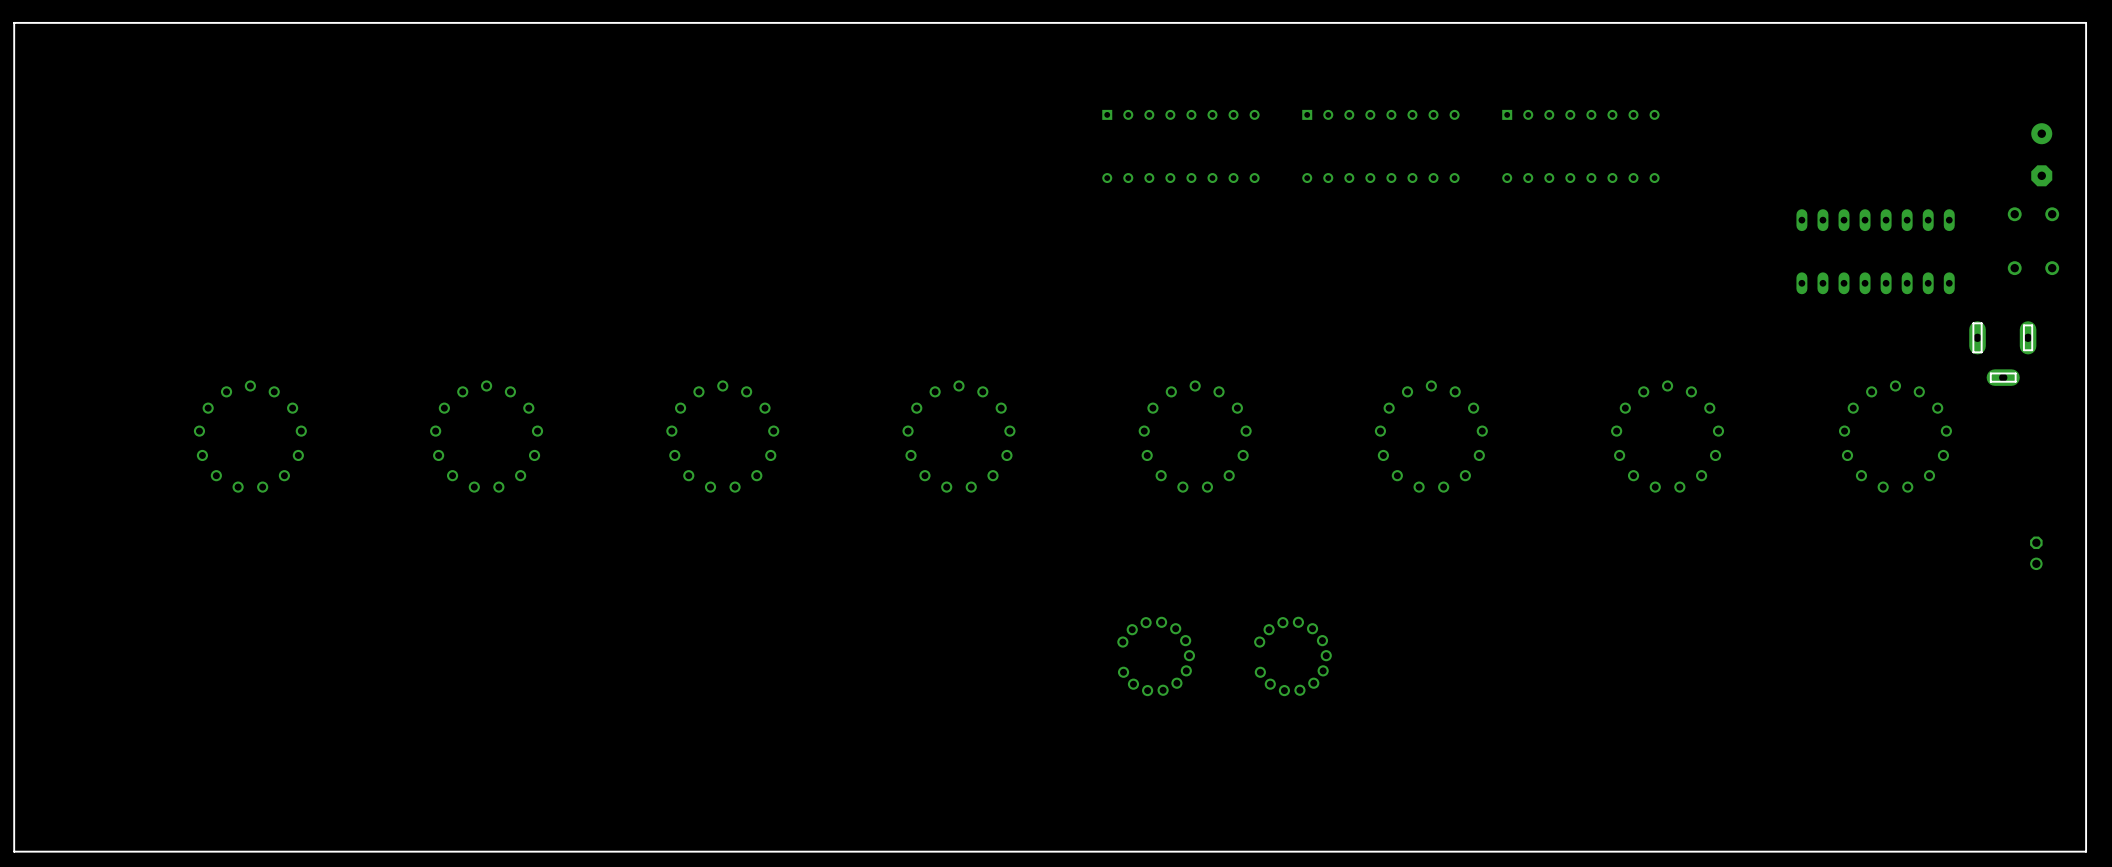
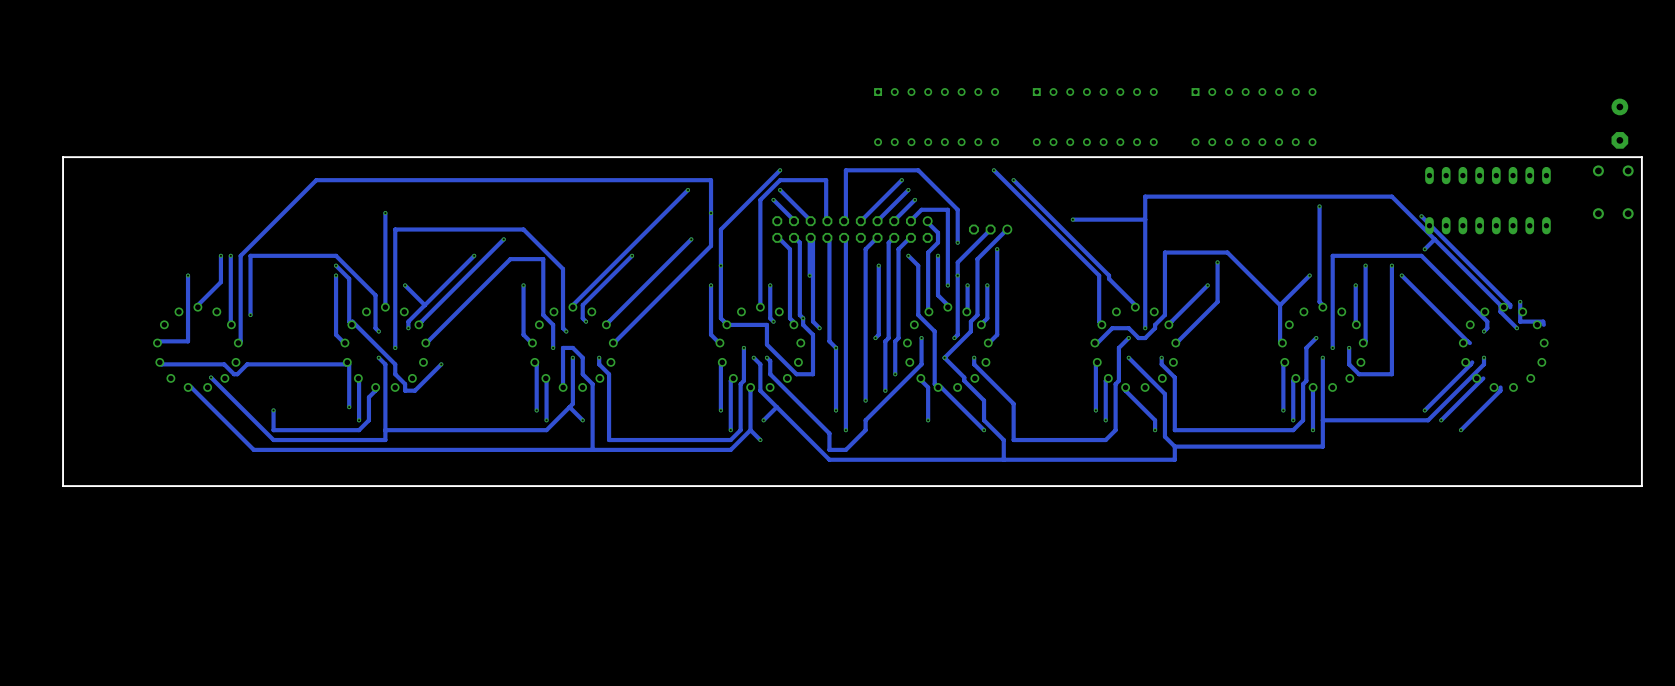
board edge: (2086, 22) (14, 22) (14, 851) (2086, 851) (2086, 22) -> none
board edge: none -> (1641, 157) (63, 157) (63, 486) (1641, 486) (1641, 157)
track: none -> (780, 170) (720, 229) (720, 318) (727, 324) (766, 324) (766, 344) (796, 374) (813, 374) (813, 334) (803, 324) (803, 318) (799, 315) (799, 242) (793, 237)
via: none -> (780, 170)
track: none -> (993, 170) (1099, 275) (1099, 321) (1101, 324)
via: none -> (993, 170)
track: none -> (901, 180) (860, 221)
via: none -> (901, 180)
track: none -> (1013, 180) (1109, 275) (1109, 278) (1135, 307)
via: none -> (1013, 180)
track: none -> (688, 190) (572, 307)
via: none -> (688, 190)
track: none -> (780, 190) (810, 221)
via: none -> (780, 190)
track: none -> (908, 190) (877, 221)
via: none -> (908, 190)
track: none -> (773, 199) (793, 221)
via: none -> (773, 199)
track: none -> (914, 199) (894, 221)
via: none -> (914, 199)
track: none -> (1319, 206) (1319, 301) (1322, 307)
via: none -> (1319, 206)
track: none -> (385, 213) (385, 307)
via: none -> (385, 213)
via: none -> (711, 213)
track: none -> (1421, 216) (1510, 307)
via: none -> (1421, 216)
via: none -> (1072, 219)
track: none -> (1145, 219) (1072, 219)
track: none -> (827, 221) (826, 180) (780, 180) (760, 199) (760, 307)
track: none -> (844, 221) (845, 219) (845, 170) (918, 170) (957, 209) (957, 242)
track: none -> (910, 221) (921, 209) (947, 209) (947, 285)
track: none -> (927, 221) (937, 232) (937, 242) (928, 252) (928, 311)
part: none -> (852, 229)
track: none -> (990, 229) (957, 262) (957, 334) (954, 338)
part: none -> (990, 229)
track: none -> (1007, 229) (977, 259) (977, 315) (970, 321) (970, 331) (944, 357) (984, 400) (984, 420) (1003, 440) (1003, 459)
track: none -> (777, 237) (789, 249) (789, 318) (793, 324)
track: none -> (827, 237) (829, 239) (829, 341) (836, 347) (836, 410)
track: none -> (844, 237) (845, 239) (845, 430)
track: none -> (877, 237) (865, 249) (865, 400)
track: none -> (894, 237) (888, 242) (888, 338) (885, 341) (885, 390)
track: none -> (910, 237) (898, 249) (898, 338) (895, 341) (895, 374)
track: none -> (503, 239) (418, 324)
via: none -> (503, 239)
track: none -> (691, 239) (606, 324)
via: none -> (691, 239)
track: none -> (1434, 239) (1424, 249)
via: none -> (957, 242)
track: none -> (997, 249) (997, 334) (988, 343)
via: none -> (997, 249)
via: none -> (1424, 249)
track: none -> (220, 255) (220, 282) (197, 307)
via: none -> (220, 255)
track: none -> (230, 255) (231, 324)
via: none -> (230, 255)
track: none -> (474, 255) (408, 321) (408, 328)
via: none -> (474, 255)
track: none -> (632, 255) (582, 305) (582, 318) (586, 321)
via: none -> (632, 255)
track: none -> (908, 255) (918, 265) (918, 315) (934, 331) (934, 384) (941, 387) (984, 430)
via: none -> (908, 255)
track: none -> (937, 255) (937, 295) (947, 307)
via: none -> (937, 255)
track: none -> (1217, 262) (1217, 301) (1175, 343)
via: none -> (1217, 262)
track: none -> (336, 265) (349, 278) (349, 321) (351, 324) (352, 321) (395, 364) (395, 374) (405, 384) (405, 390) (414, 390) (441, 364)
via: none -> (336, 265)
via: none -> (720, 265)
track: none -> (878, 265) (878, 334) (875, 338)
via: none -> (878, 265)
track: none -> (1365, 265) (1365, 341) (1363, 343)
via: none -> (1365, 265)
track: none -> (1391, 265) (1391, 374) (1359, 374) (1349, 364) (1349, 347)
via: none -> (1391, 265)
track: none -> (188, 275) (188, 341) (158, 341) (157, 343)
via: none -> (188, 275)
track: none -> (336, 275) (336, 334) (344, 343)
via: none -> (336, 275)
track: none -> (809, 275) (810, 237) (813, 239) (813, 321) (819, 328)
via: none -> (809, 275)
via: none -> (957, 275)
track: none -> (1309, 275) (1280, 305)
via: none -> (1309, 275)
track: none -> (1401, 275) (1469, 343)
via: none -> (1401, 275)
part: (2002, 353) -> none
track: none -> (405, 285) (424, 305)
via: none -> (405, 285)
track: none -> (523, 285) (523, 334) (532, 343)
via: none -> (523, 285)
track: none -> (711, 285) (711, 334) (719, 343)
via: none -> (711, 285)
track: none -> (770, 285) (770, 318) (773, 321)
via: none -> (770, 285)
via: none -> (947, 285)
track: none -> (967, 285) (966, 311)
via: none -> (967, 285)
track: none -> (987, 285) (987, 318) (981, 324)
via: none -> (987, 285)
track: none -> (1207, 285) (1168, 324)
via: none -> (1207, 285)
track: none -> (1355, 285) (1356, 324)
via: none -> (1355, 285)
track: none -> (1520, 301) (1520, 321) (1543, 321) (1543, 324)
via: none -> (1520, 301)
track: none -> (1280, 305) (1280, 341) (1282, 343)
track: none -> (1280, 305) (1227, 252) (1164, 252) (1164, 315) (1155, 324) (1155, 328) (1145, 338) (1138, 338) (1128, 328) (1112, 328) (1095, 344) (1094, 343)
track: none -> (250, 315) (250, 255) (336, 255) (375, 295) (375, 328) (378, 331)
via: none -> (250, 315)
via: none -> (803, 318)
via: none -> (586, 321)
via: none -> (773, 321)
via: none -> (408, 328)
via: none -> (819, 328)
via: none -> (1145, 328)
track: none -> (1516, 328) (1500, 311) (1500, 305) (1391, 196) (1145, 196) (1145, 328)
via: none -> (1516, 328)
via: none -> (378, 331)
track: none -> (566, 331) (563, 328) (563, 268) (523, 229) (395, 229) (395, 347)
via: none -> (566, 331)
track: none -> (1484, 331) (1487, 328) (1487, 321) (1421, 255) (1332, 255) (1332, 347)
via: none -> (1484, 331)
via: none -> (875, 338)
track: none -> (921, 338) (921, 364) (865, 420) (865, 430) (845, 449) (829, 449) (829, 433) (770, 374) (770, 361) (766, 357)
via: none -> (921, 338)
via: none -> (954, 338)
track: none -> (1128, 338) (1118, 347) (1118, 380) (1115, 384) (1115, 430) (1105, 440) (1013, 440) (1013, 403) (974, 364) (974, 357)
via: none -> (1128, 338)
track: none -> (1316, 338) (1306, 347) (1306, 380) (1303, 384) (1303, 420) (1293, 430) (1174, 430) (1174, 377) (1161, 364) (1161, 357)
via: none -> (1316, 338)
track: none -> (425, 343) (510, 259) (543, 259) (543, 315) (553, 324) (553, 347)
track: none -> (613, 343) (711, 245) (711, 180) (316, 180) (240, 255) (240, 341) (238, 343)
via: none -> (395, 347)
via: none -> (553, 347)
track: none -> (743, 347) (743, 380) (740, 384) (740, 430) (730, 440) (609, 440) (609, 374) (599, 364) (599, 357)
via: none -> (743, 347)
via: none -> (836, 347)
via: none -> (1332, 347)
via: none -> (1349, 347)
track: none -> (378, 357) (385, 364) (385, 440) (273, 440) (211, 377)
via: none -> (378, 357)
track: none -> (572, 357) (572, 403) (546, 430) (385, 430)
via: none -> (572, 357)
via: none -> (599, 357)
track: none -> (753, 357) (760, 364) (760, 390) (829, 459) (1174, 459) (1174, 446)
via: none -> (753, 357)
via: none -> (766, 357)
via: none -> (944, 357)
via: none -> (974, 357)
track: none -> (1128, 357) (1164, 393) (1164, 436) (1174, 446)
via: none -> (1128, 357)
via: none -> (1161, 357)
track: none -> (1322, 357) (1322, 446) (1174, 446)
via: none -> (1322, 357)
track: none -> (1484, 357) (1484, 364) (1428, 420) (1322, 420)
via: none -> (1484, 357)
track: none -> (159, 362) (161, 364) (224, 364) (234, 374) (237, 374) (247, 364) (345, 364) (347, 362) (349, 364) (349, 407)
track: none -> (534, 362) (536, 364) (536, 410)
track: none -> (722, 362) (720, 410)
track: none -> (1097, 362) (1095, 410)
track: none -> (1284, 362) (1283, 410)
track: none -> (1472, 362) (1424, 410)
via: none -> (441, 364)
via: none -> (895, 374)
via: none -> (211, 377)
track: none -> (358, 378) (359, 420)
track: none -> (545, 378) (546, 420)
track: none -> (733, 378) (730, 380) (730, 430)
track: none -> (920, 378) (928, 387) (928, 420)
track: none -> (1108, 378) (1105, 380) (1105, 420)
track: none -> (1295, 378) (1293, 380) (1293, 420)
track: none -> (1483, 378) (1441, 420)
track: none -> (188, 387) (191, 387) (253, 449) (730, 449) (750, 430)
track: none -> (375, 387) (375, 390) (368, 397) (368, 420) (359, 430) (273, 430) (273, 410)
track: none -> (563, 387) (563, 347) (572, 347) (582, 357) (582, 374) (592, 384) (592, 449)
track: none -> (750, 387) (750, 430)
track: none -> (1125, 387) (1125, 390) (1155, 420) (1155, 430)
track: none -> (1313, 387) (1312, 430)
track: none -> (1500, 387) (1500, 390) (1460, 430)
via: none -> (885, 390)
via: none -> (865, 400)
via: none -> (349, 407)
track: none -> (569, 407) (582, 420)
track: none -> (776, 407) (763, 420)
via: none -> (273, 410)
via: none -> (536, 410)
via: none -> (720, 410)
via: none -> (836, 410)
via: none -> (1095, 410)
via: none -> (1283, 410)
via: none -> (1424, 410)
via: none -> (359, 420)
via: none -> (546, 420)
via: none -> (582, 420)
via: none -> (763, 420)
via: none -> (928, 420)
via: none -> (1105, 420)
via: none -> (1293, 420)
via: none -> (1441, 420)
via: none -> (730, 430)
track: none -> (750, 430) (760, 440)
via: none -> (845, 430)
via: none -> (984, 430)
via: none -> (1155, 430)
via: none -> (1312, 430)
via: none -> (1460, 430)
via: none -> (760, 440)
part: (2036, 553) -> none
part: (1156, 656) -> none
part: (1292, 656) -> none

